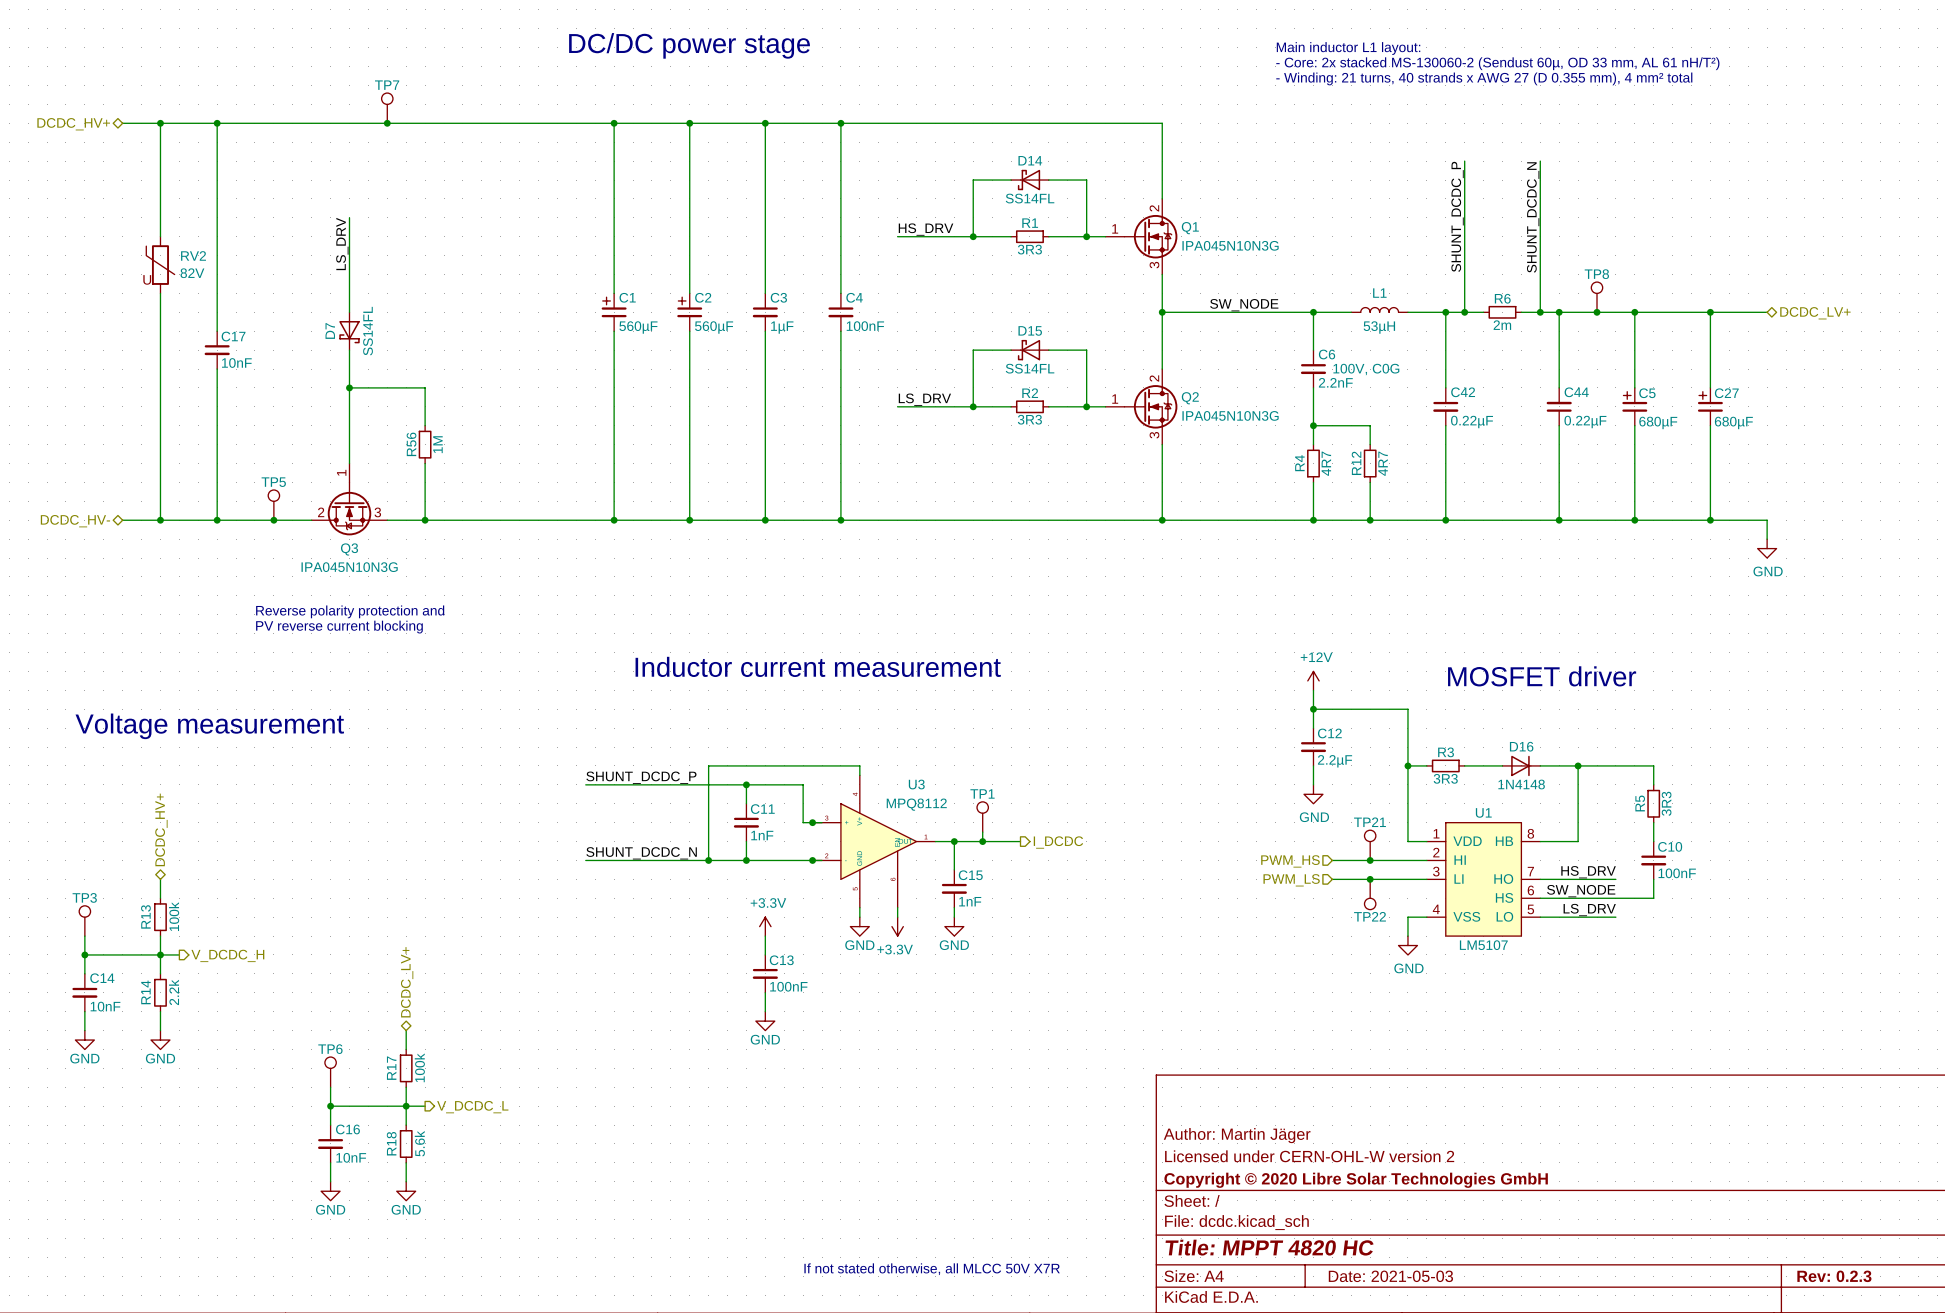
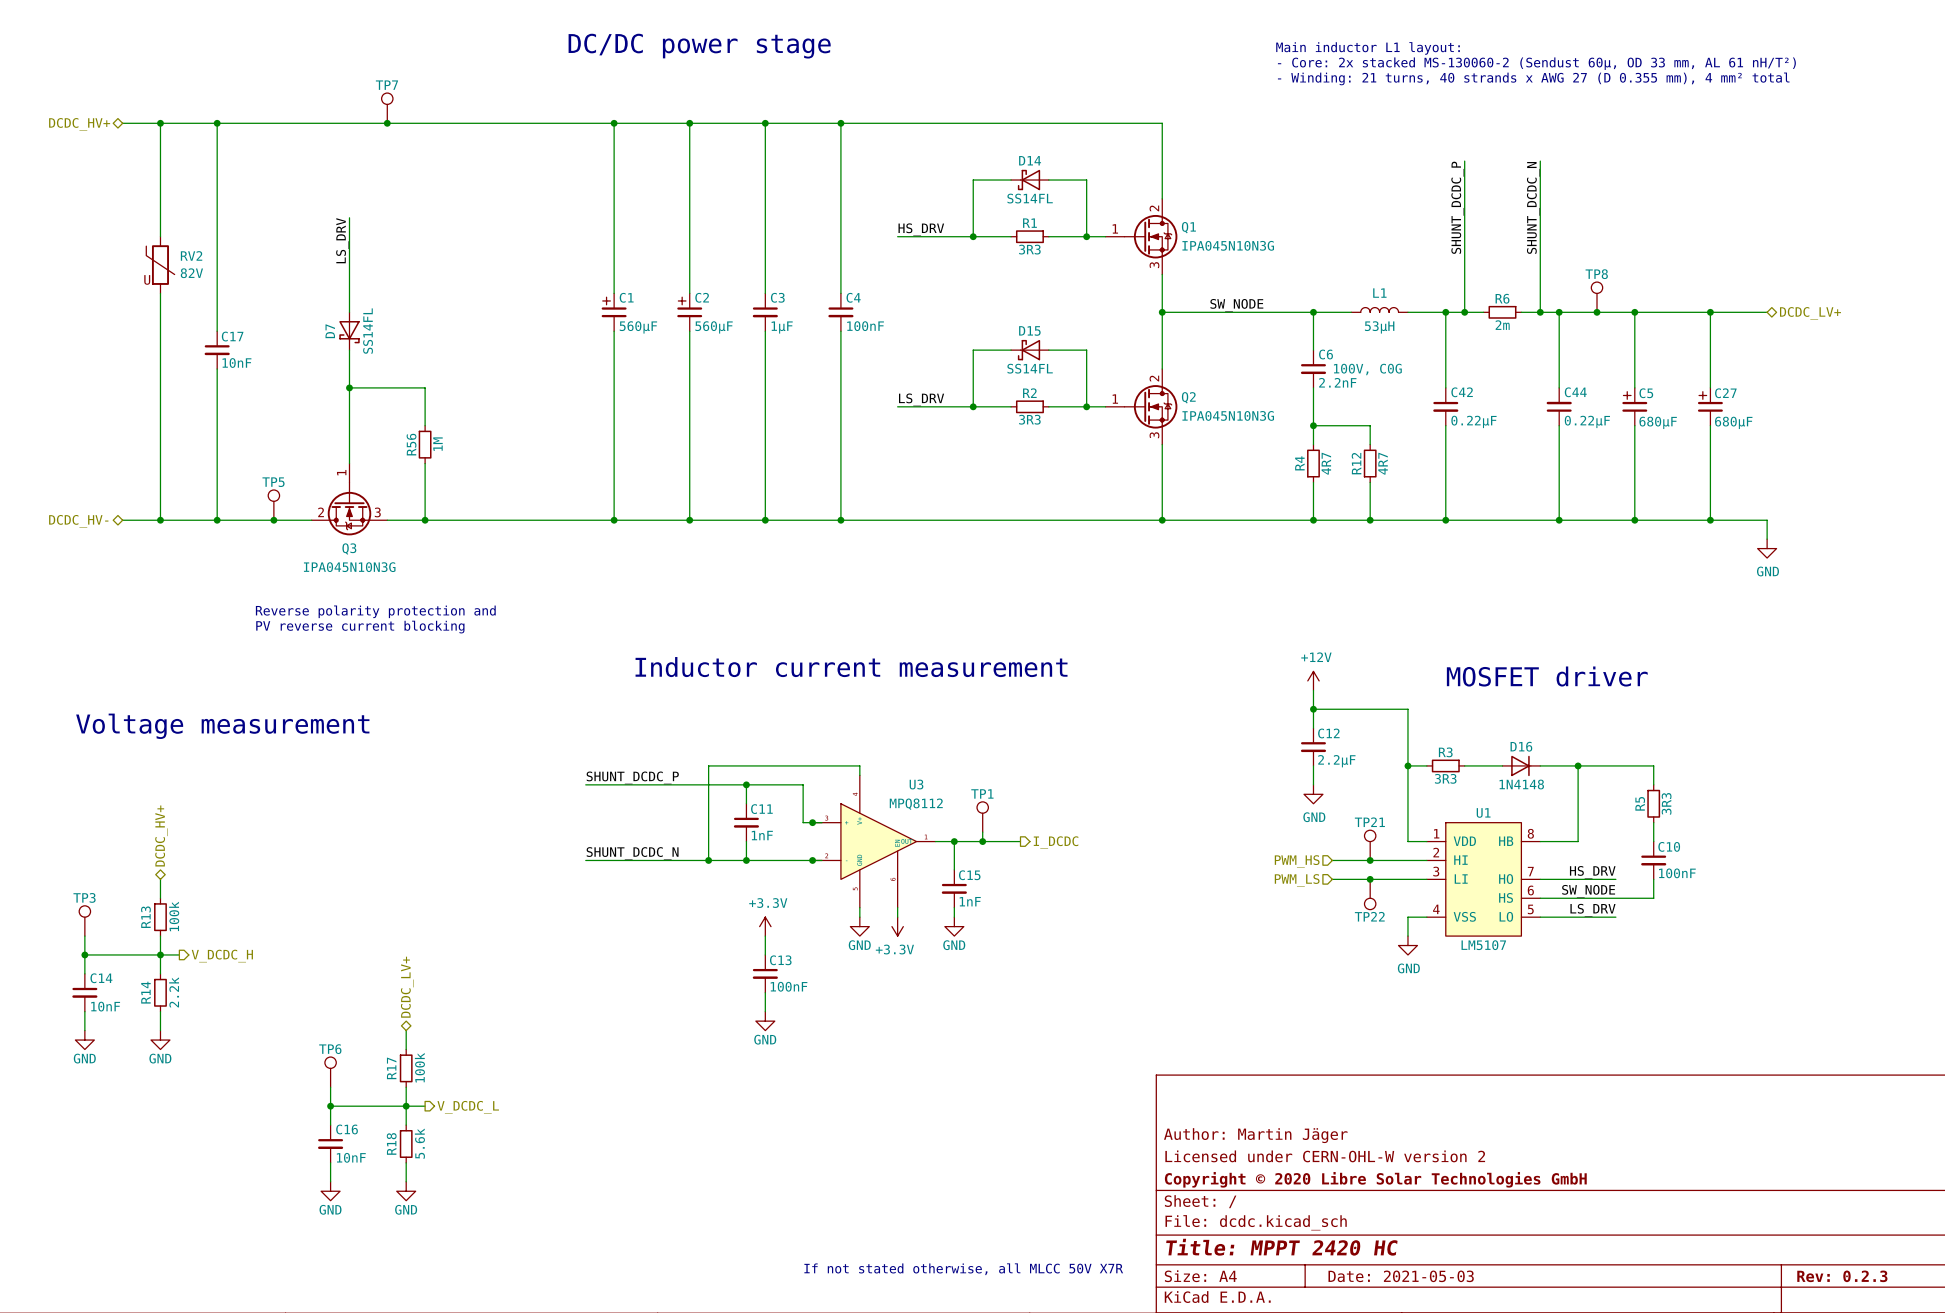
title block: Title: MPPT 4820 HC (1269, 1247) -> Title: MPPT 2420 HC (1281, 1247)

